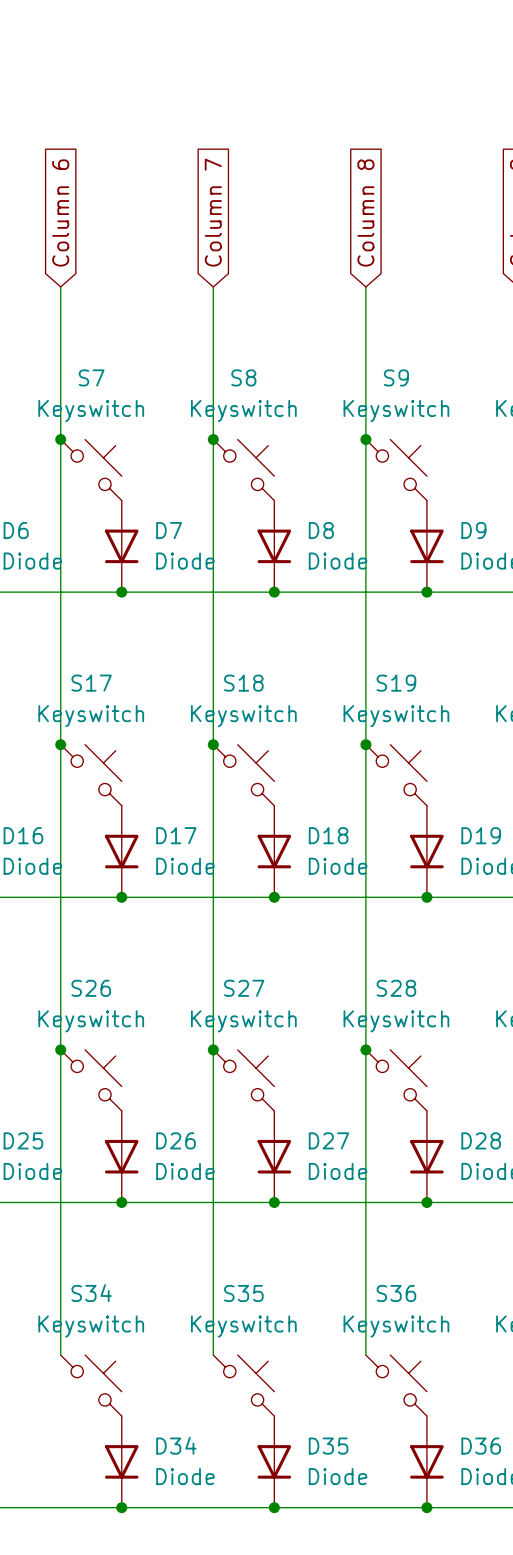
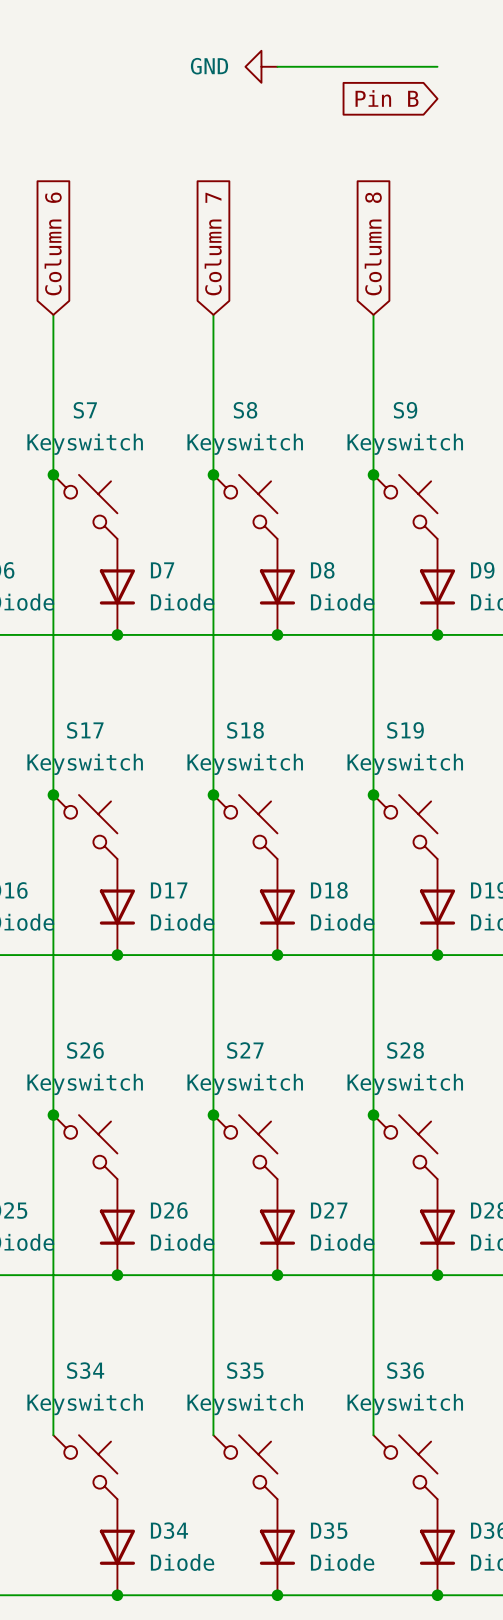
power symbol: none -> GND (261, 66)
wire: none -> (277, 66) (437, 66)
global label: none -> Pin B (387, 98)

